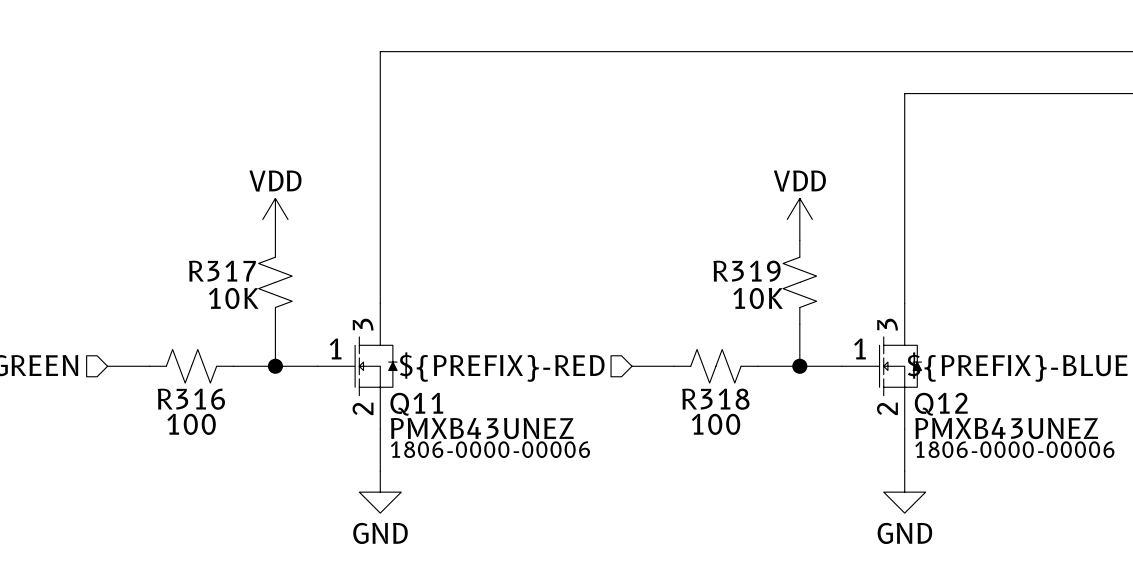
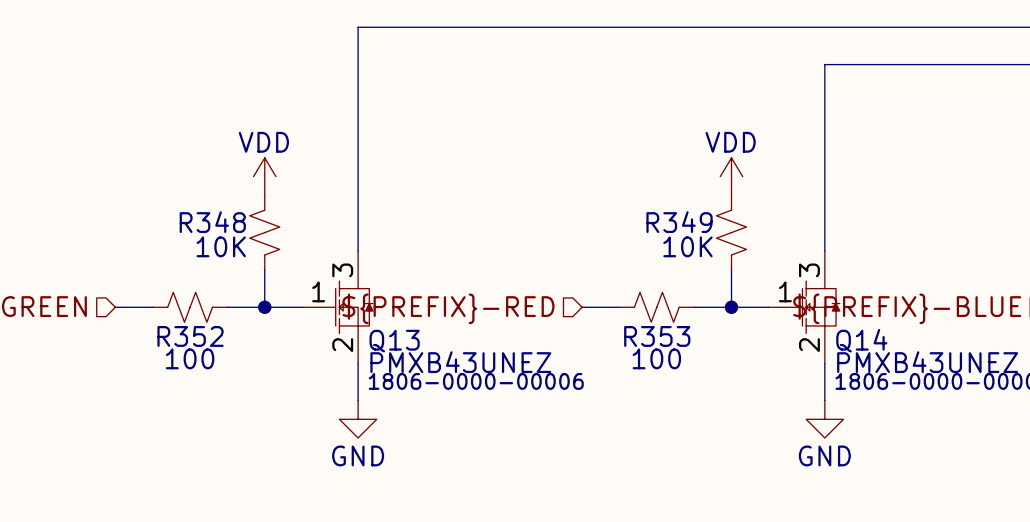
R317 name: R317 (222, 271) -> R348 (212, 222)
R319 name: R319 (747, 271) -> R349 (679, 222)
R316 name: R316 (191, 399) -> R352 (190, 336)
R318 name: R318 (715, 399) -> R353 (657, 336)
Q11 name: Q11 (416, 404) -> Q13 (394, 341)
Q12 name: Q12 (941, 404) -> Q14 (861, 340)

